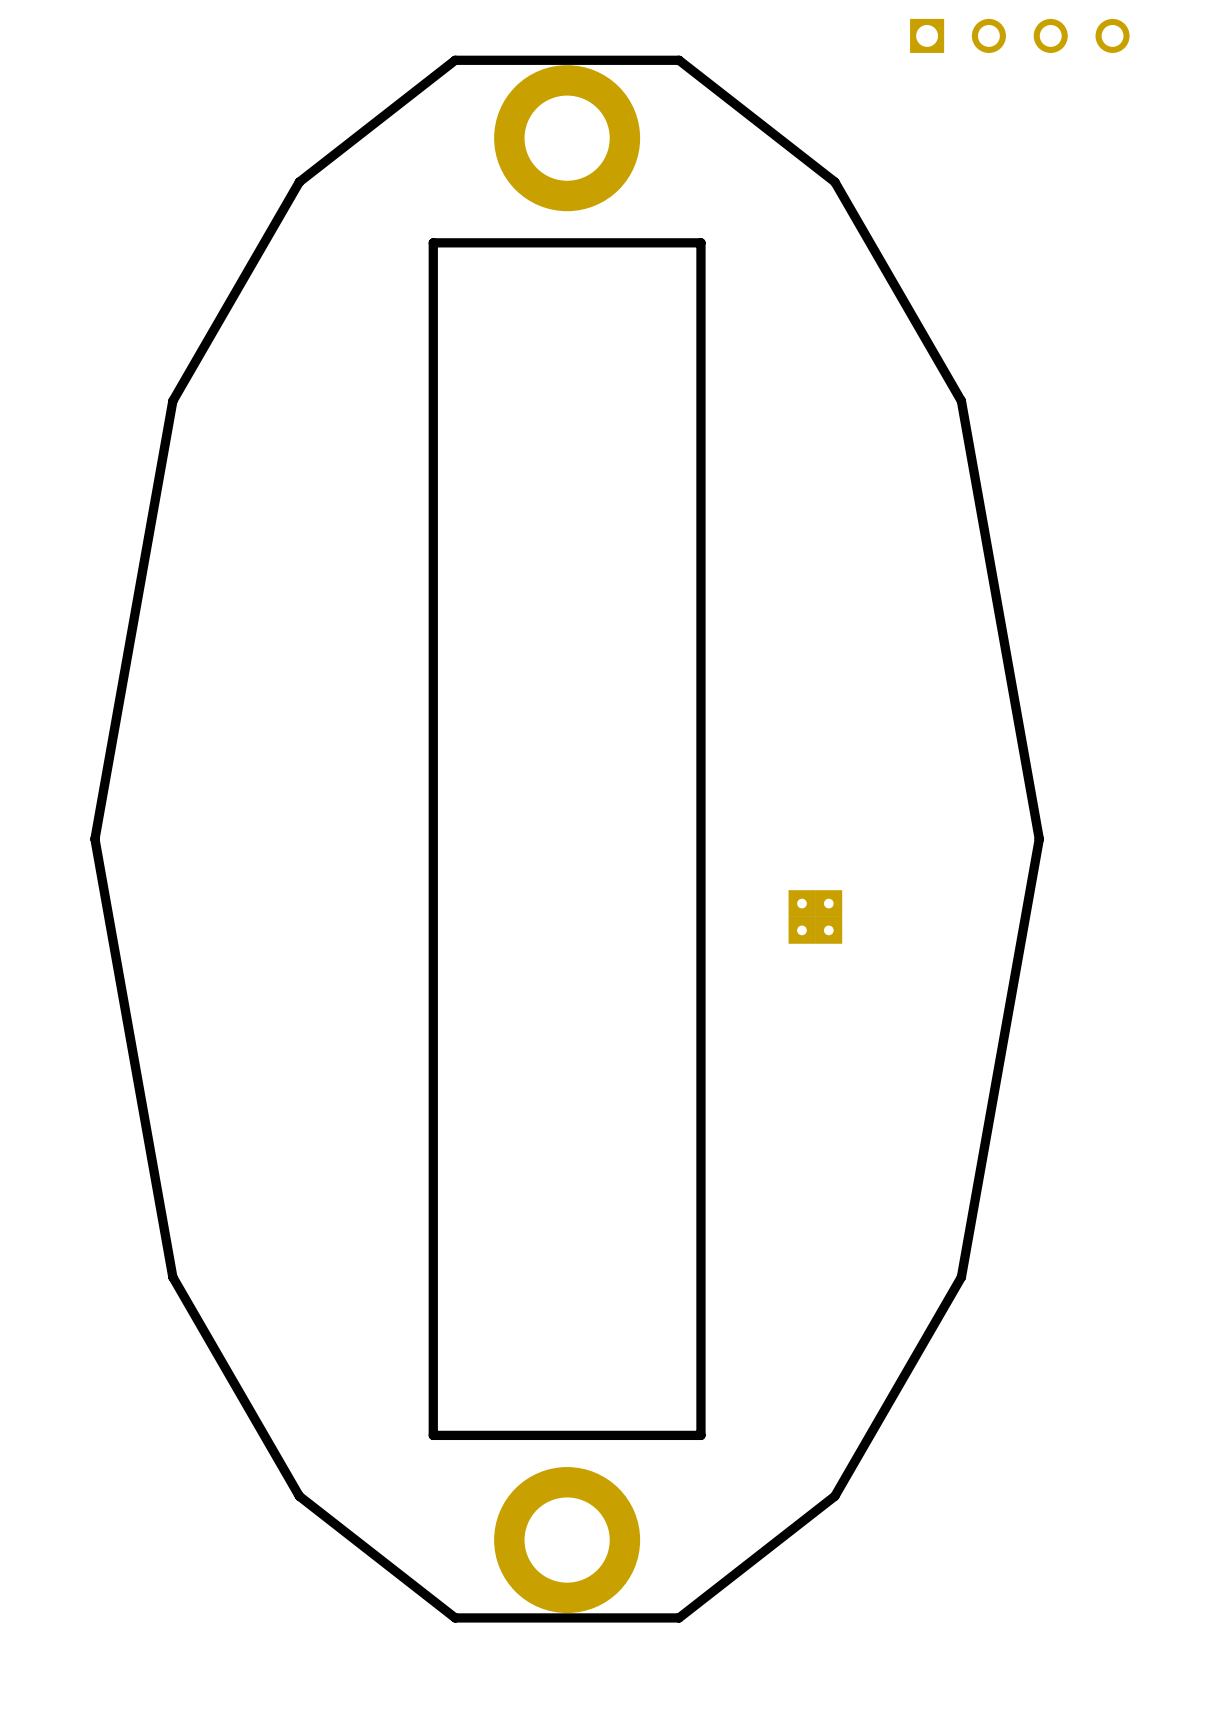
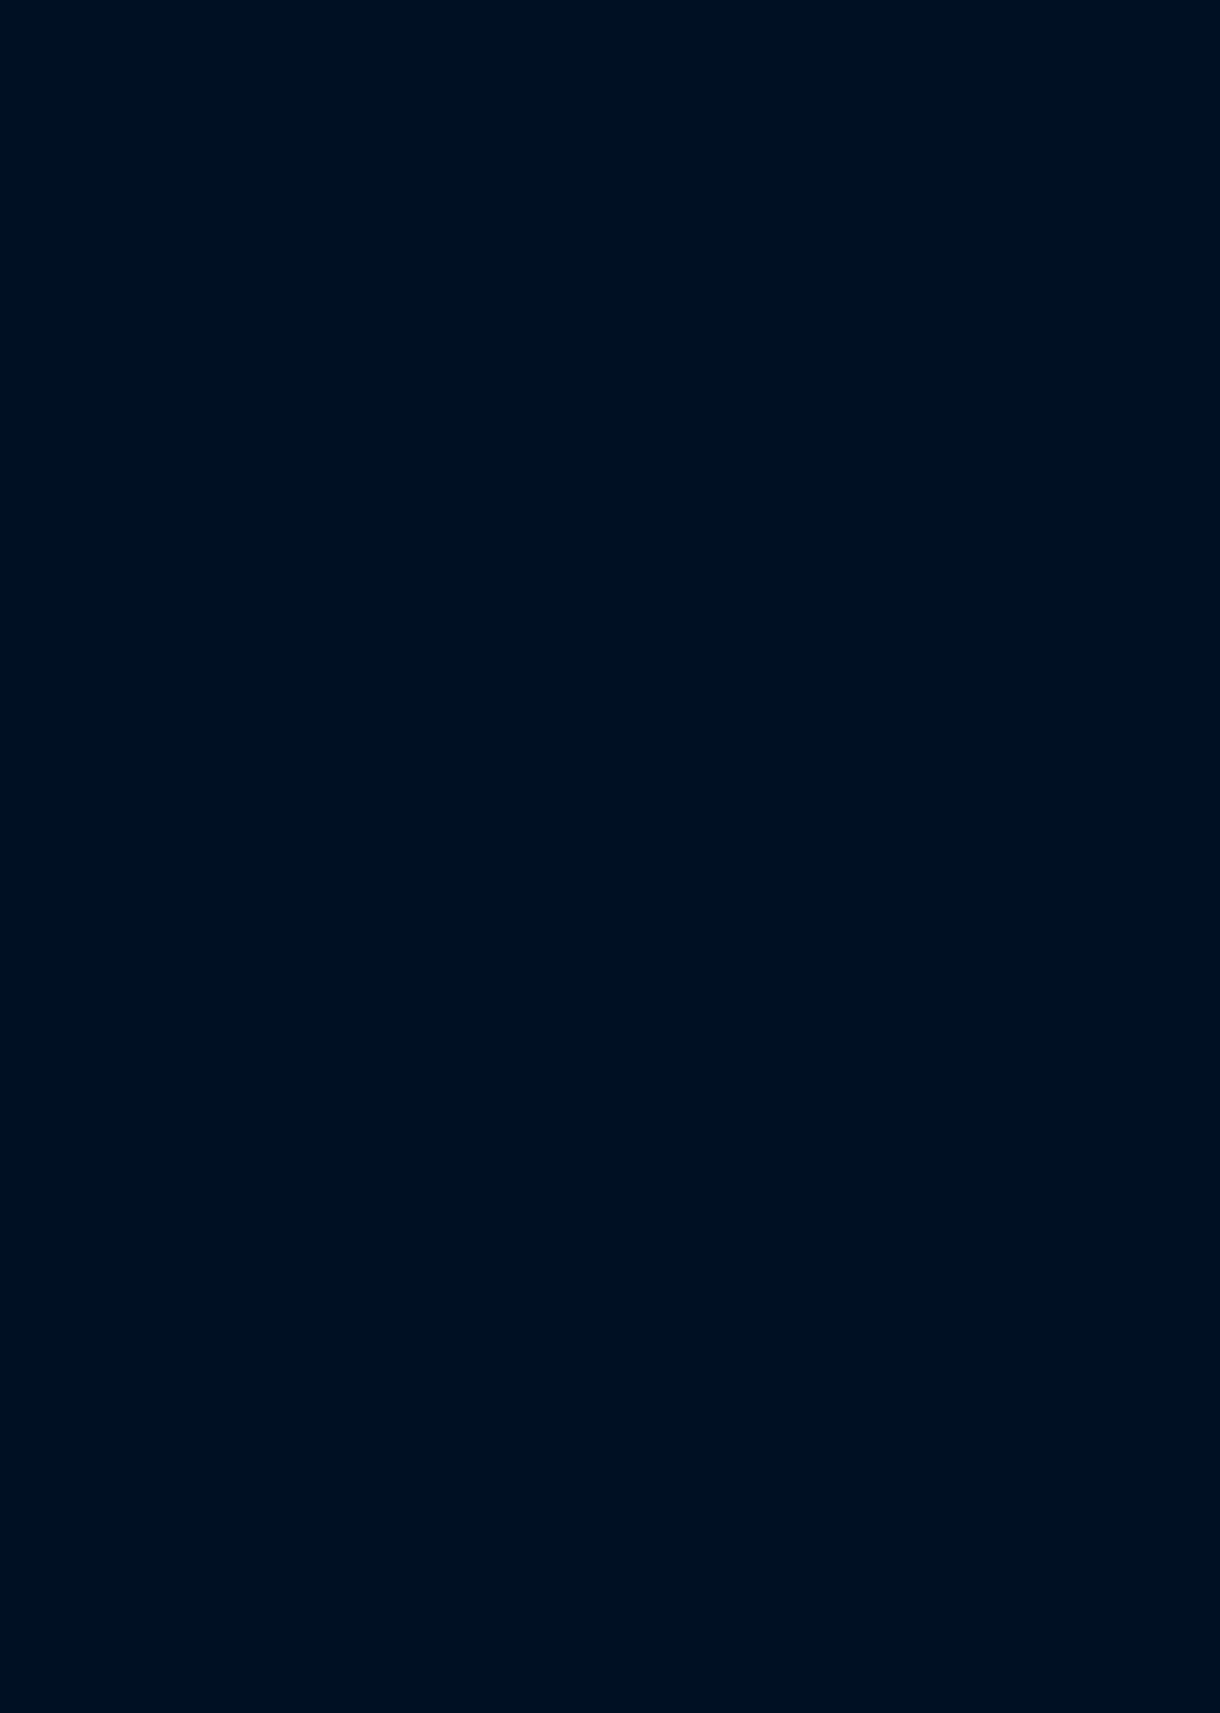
part: (1019, 35) -> none
board edge: (679, 60) (455, 60) (299, 182) (172, 401) (94, 839) (172, 1277) (299, 1496) (455, 1617) (679, 1617) (834, 1496) (961, 1277) (1039, 839) (961, 401) (834, 182) (679, 60) -> none
part: (567, 138) -> none
board edge: (700, 242) (433, 242) (433, 1435) (700, 1435) (700, 242) -> none
part: (815, 916) -> none
part: (567, 1540) -> none

